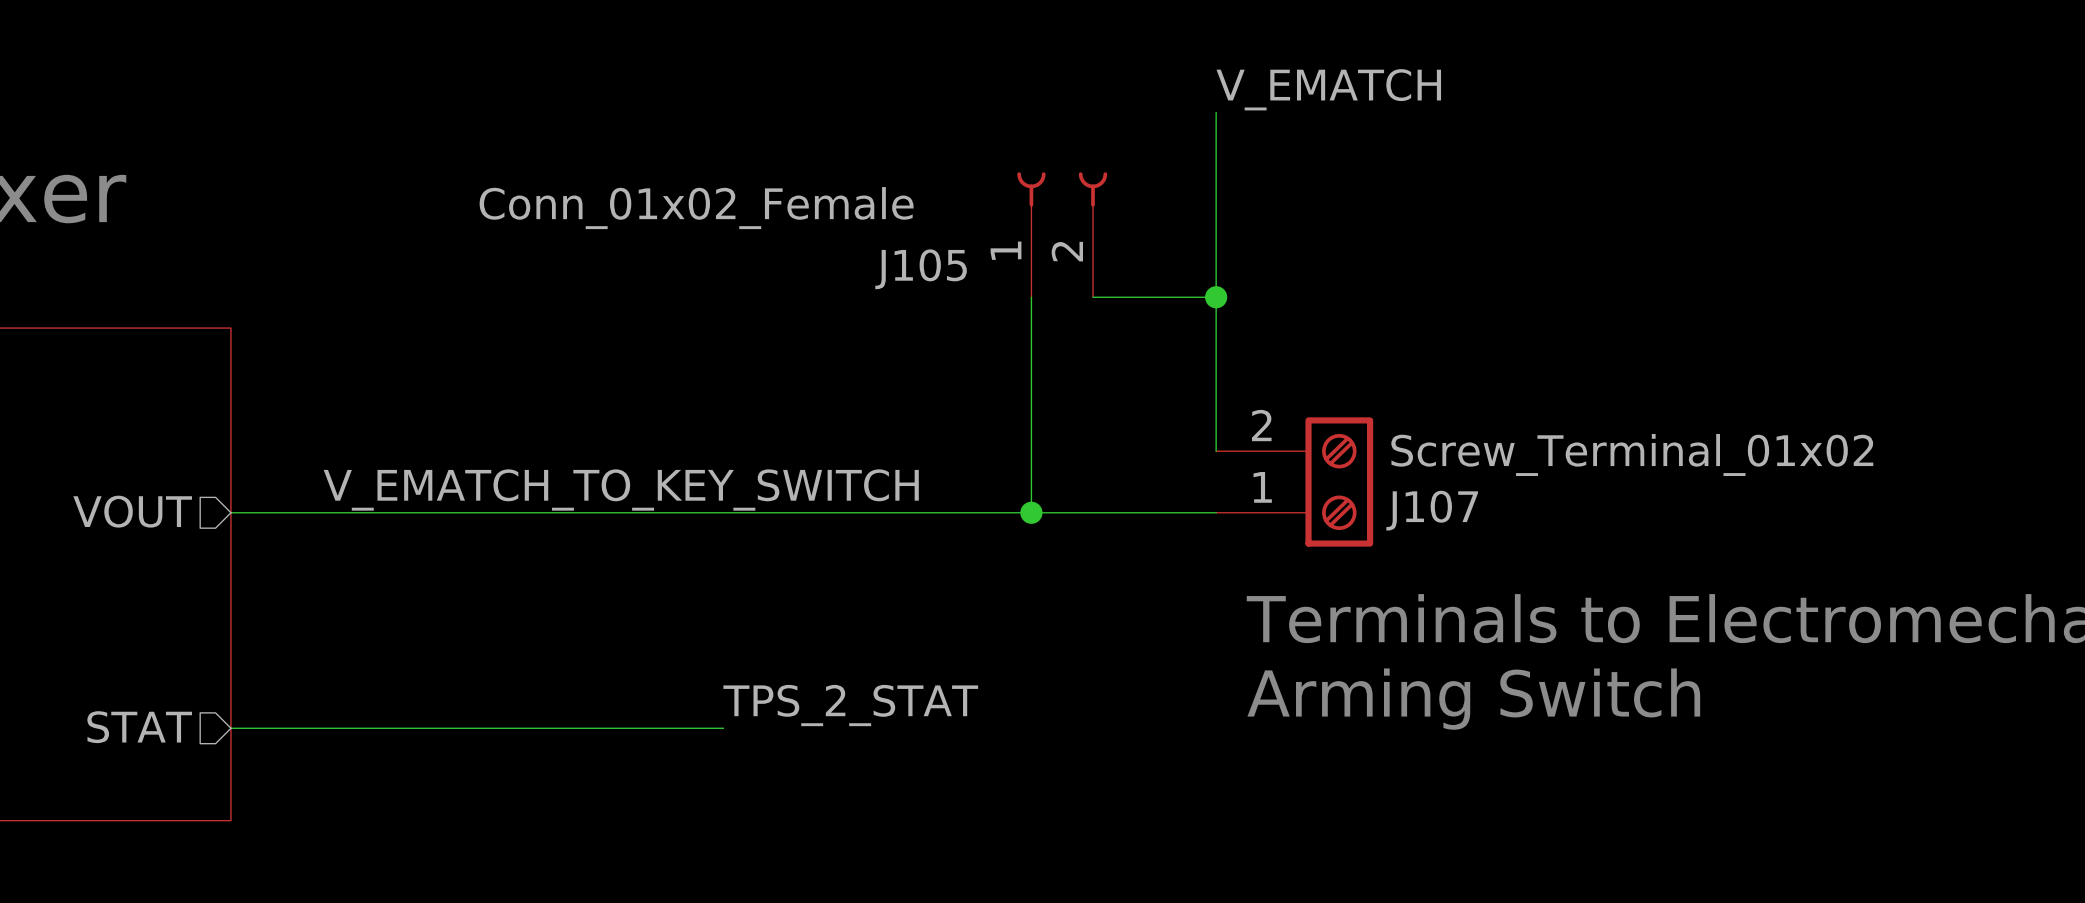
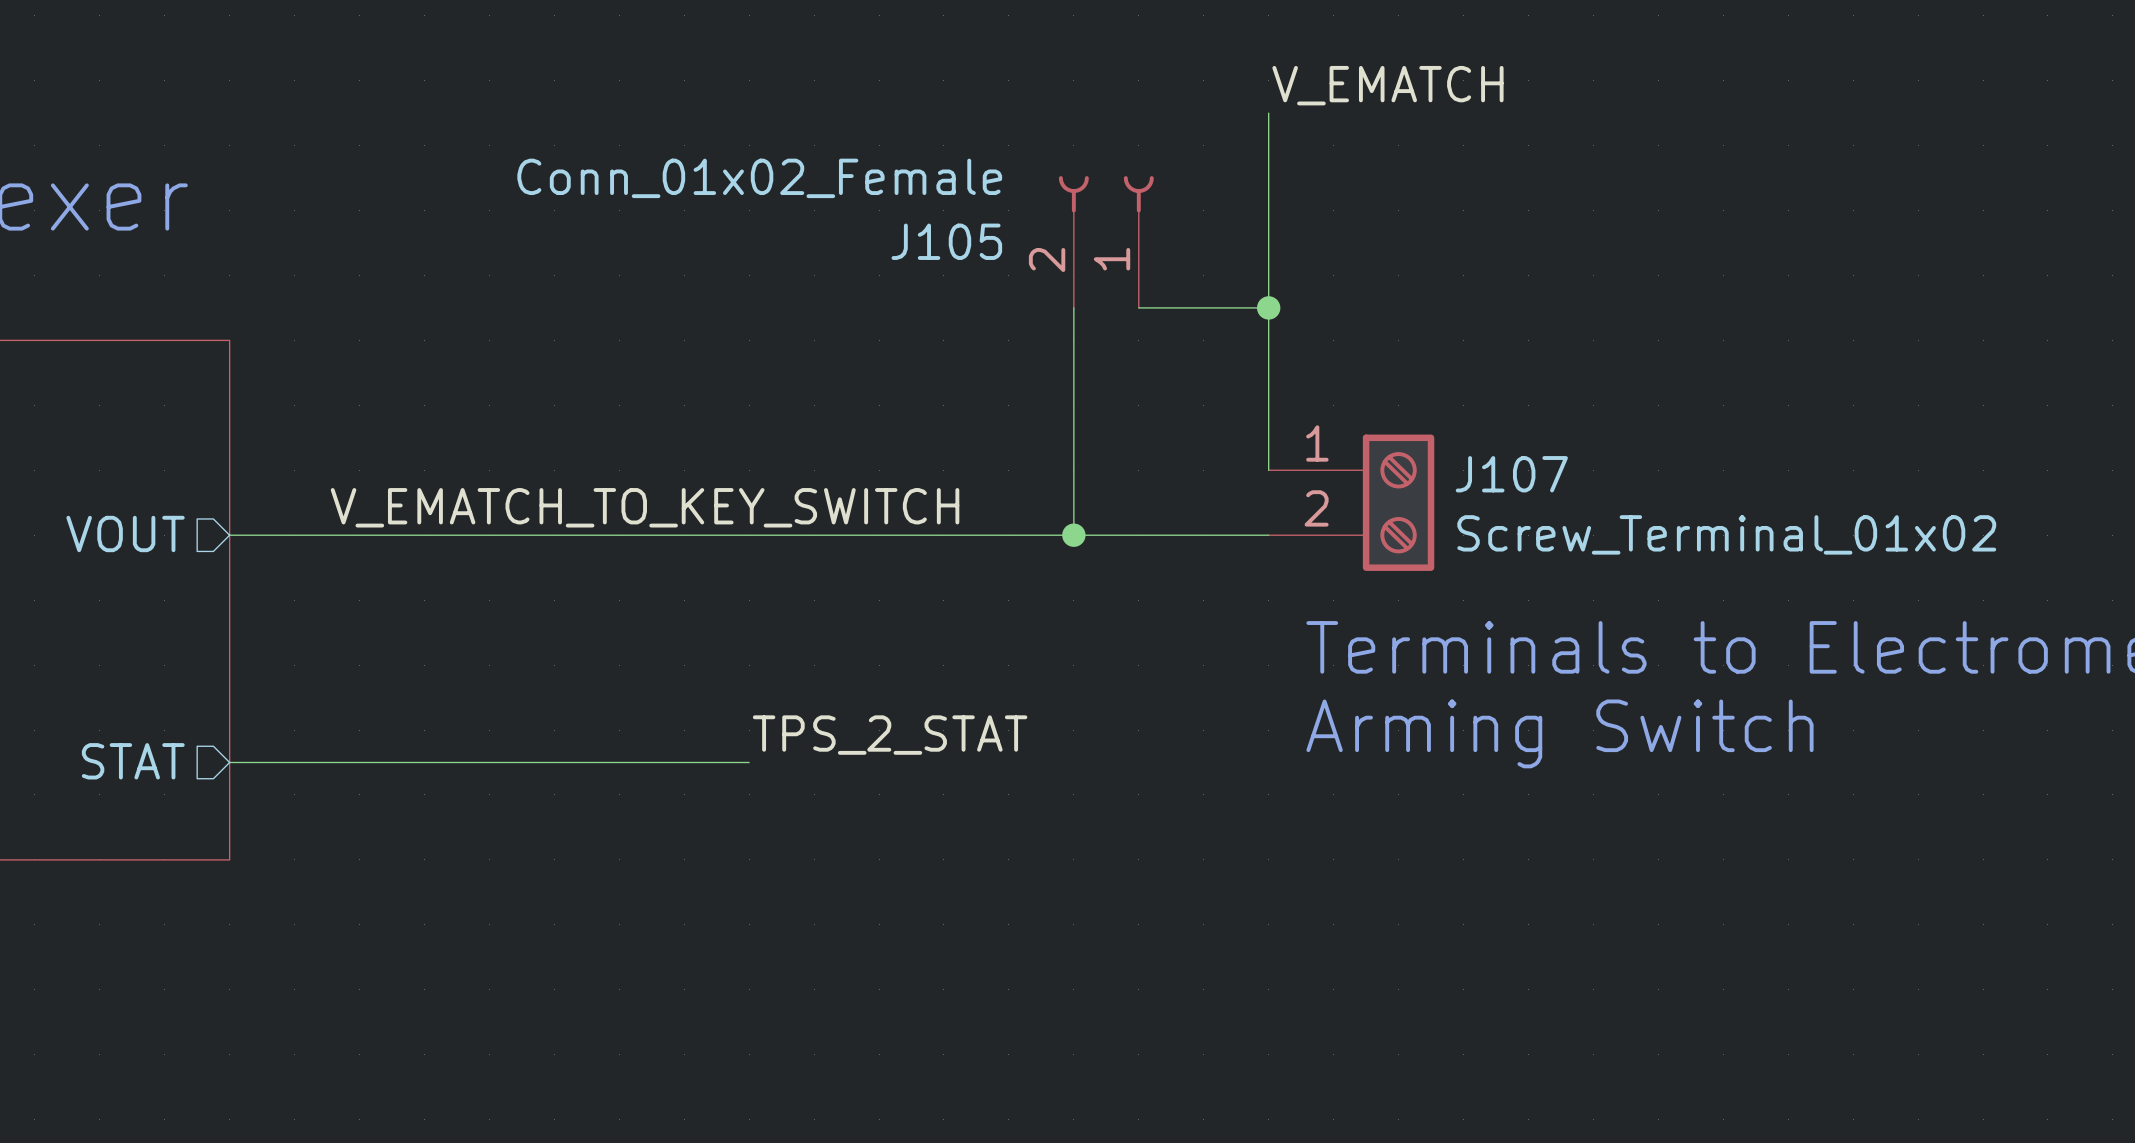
J105 flip: as is (1062, 189) -> left-right (1106, 194)
J105 name position: J105 (921, 269) -> J105 (946, 241)
J107 flip: as is (1339, 481) -> up-down (1398, 502)

